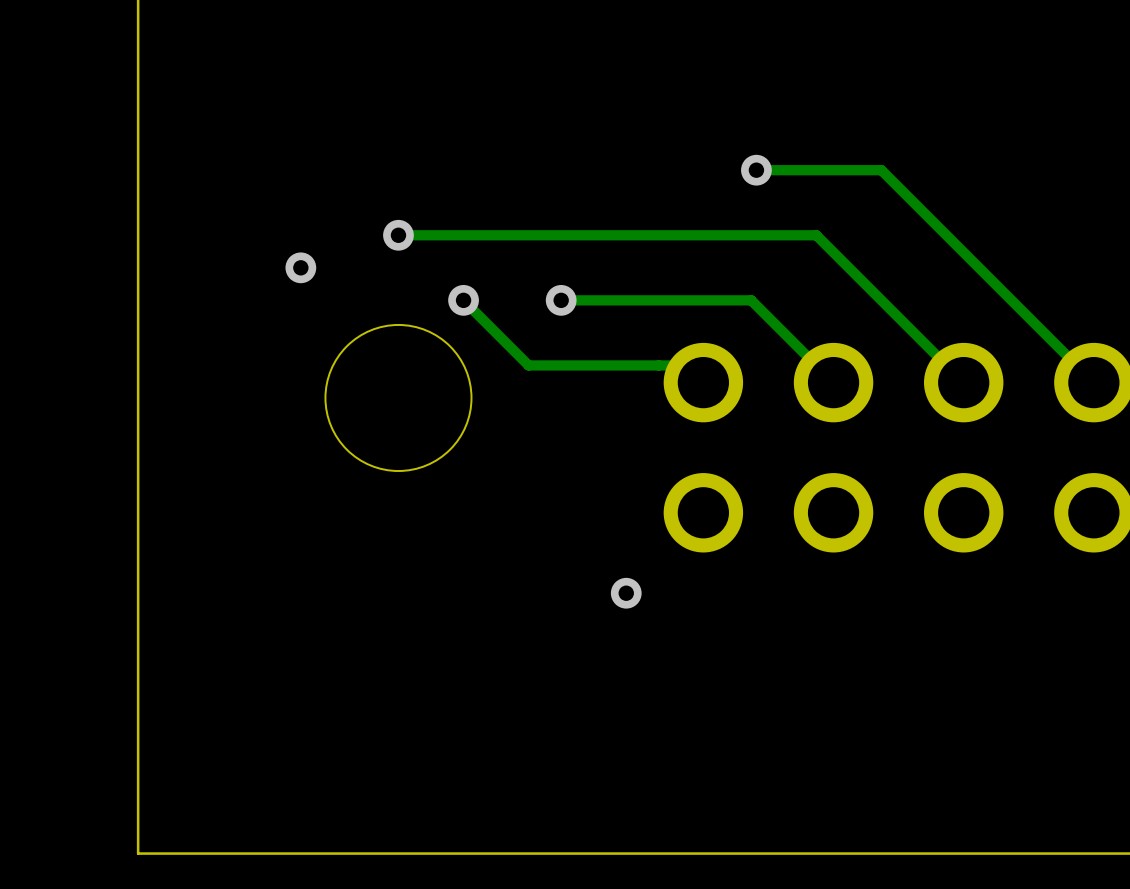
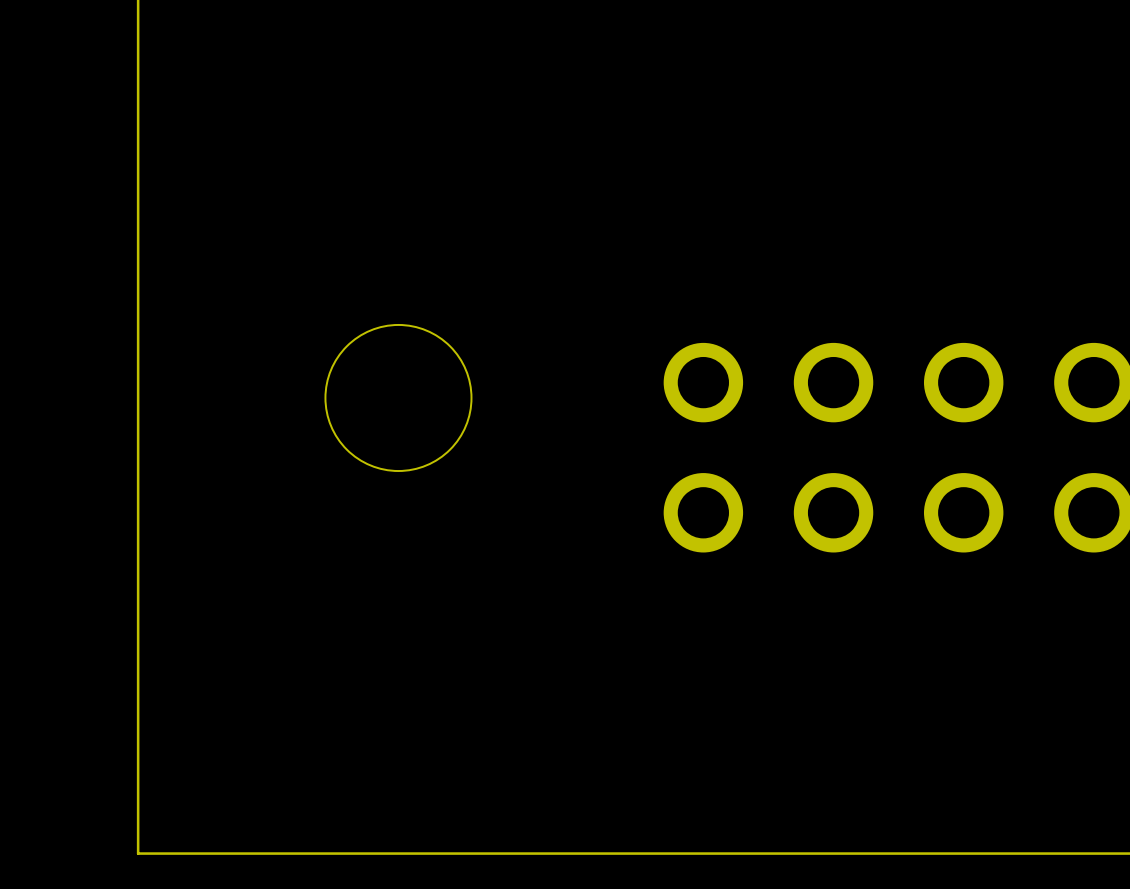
track: (756, 170) (881, 170) (1093, 382) -> none
via: (756, 170) -> none
track: (398, 235) (816, 235) (963, 382) -> none
via: (398, 235) -> none
via: (300, 267) -> none
track: (463, 300) (528, 365) (686, 365) (703, 382) -> none
via: (463, 300) -> none
track: (561, 300) (751, 300) (833, 382) -> none
via: (561, 300) -> none
via: (626, 593) -> none

